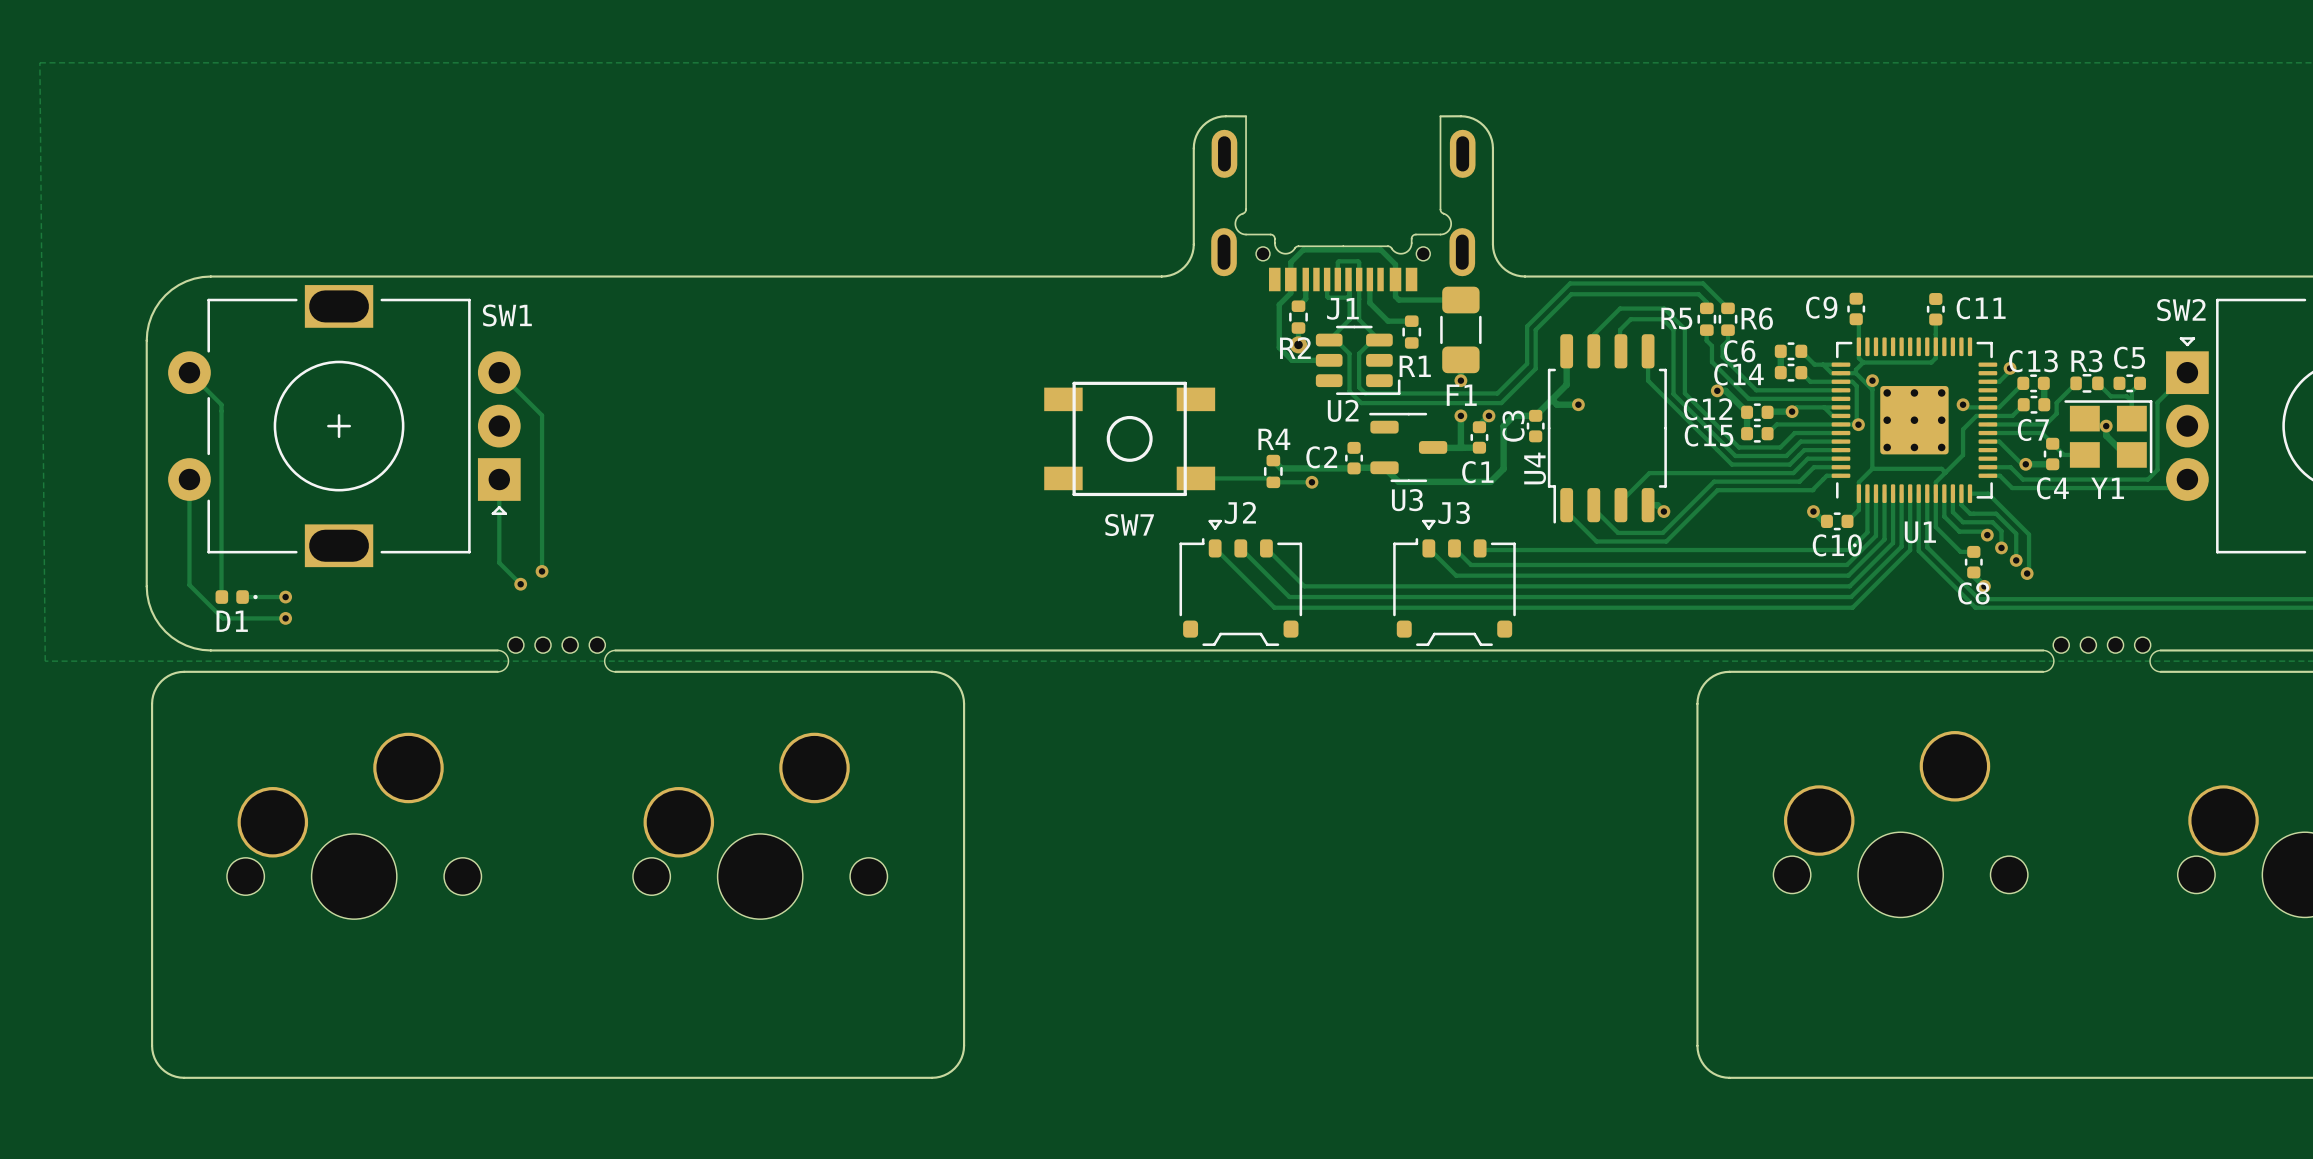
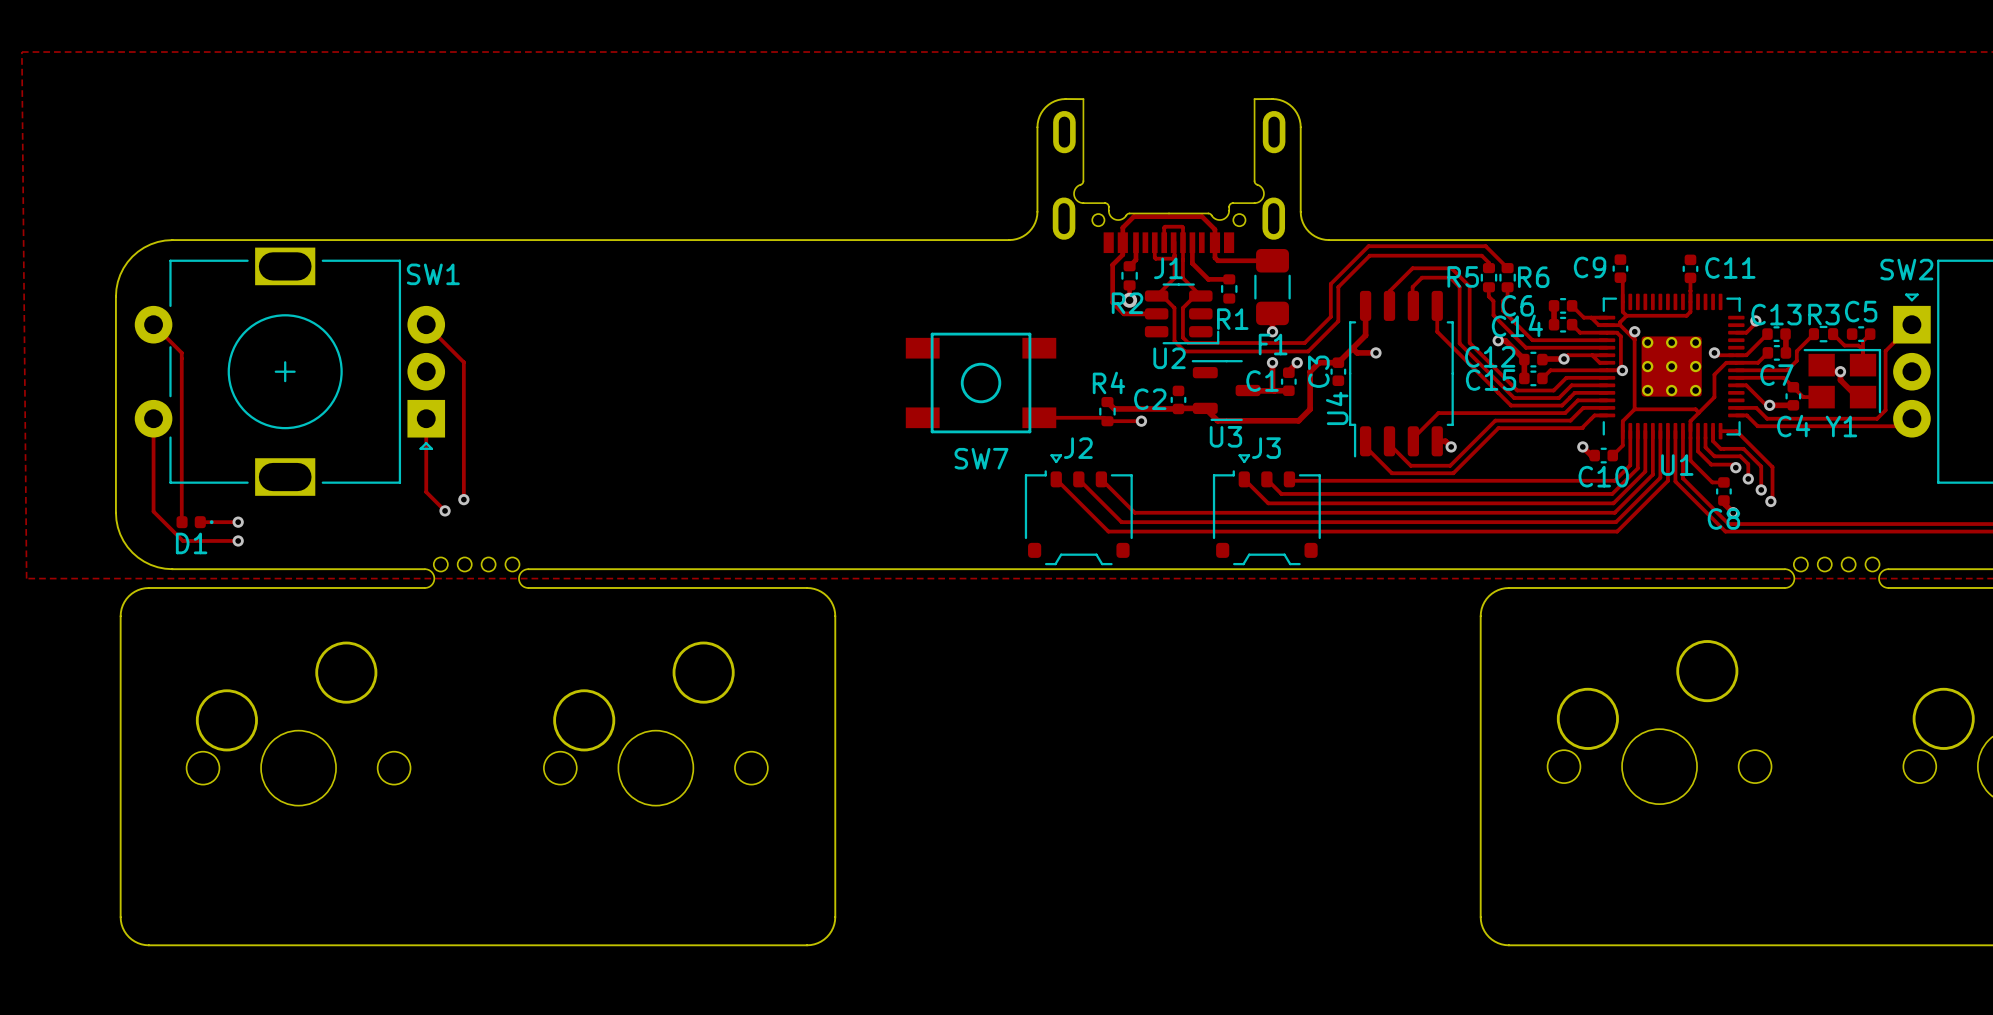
C1 name position: C1 (1477, 472) -> C1 (1262, 381)

